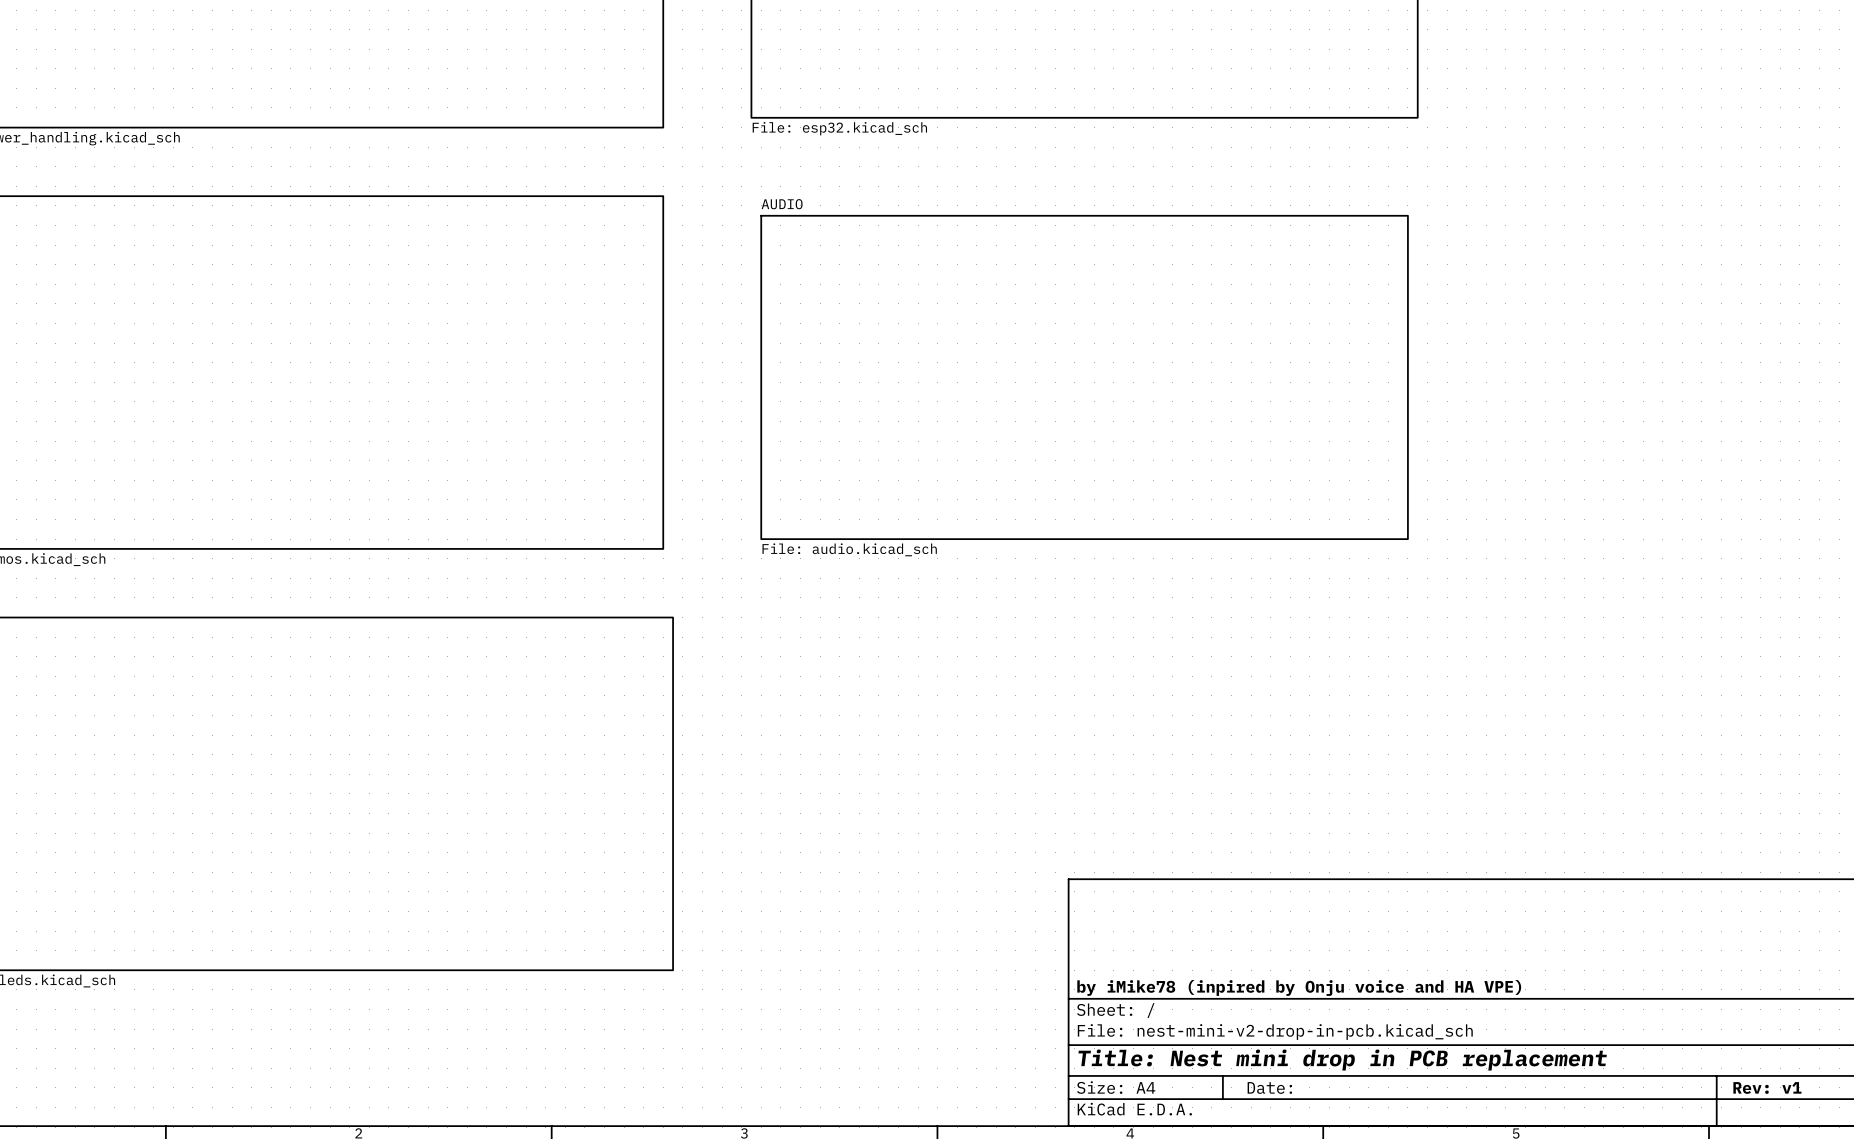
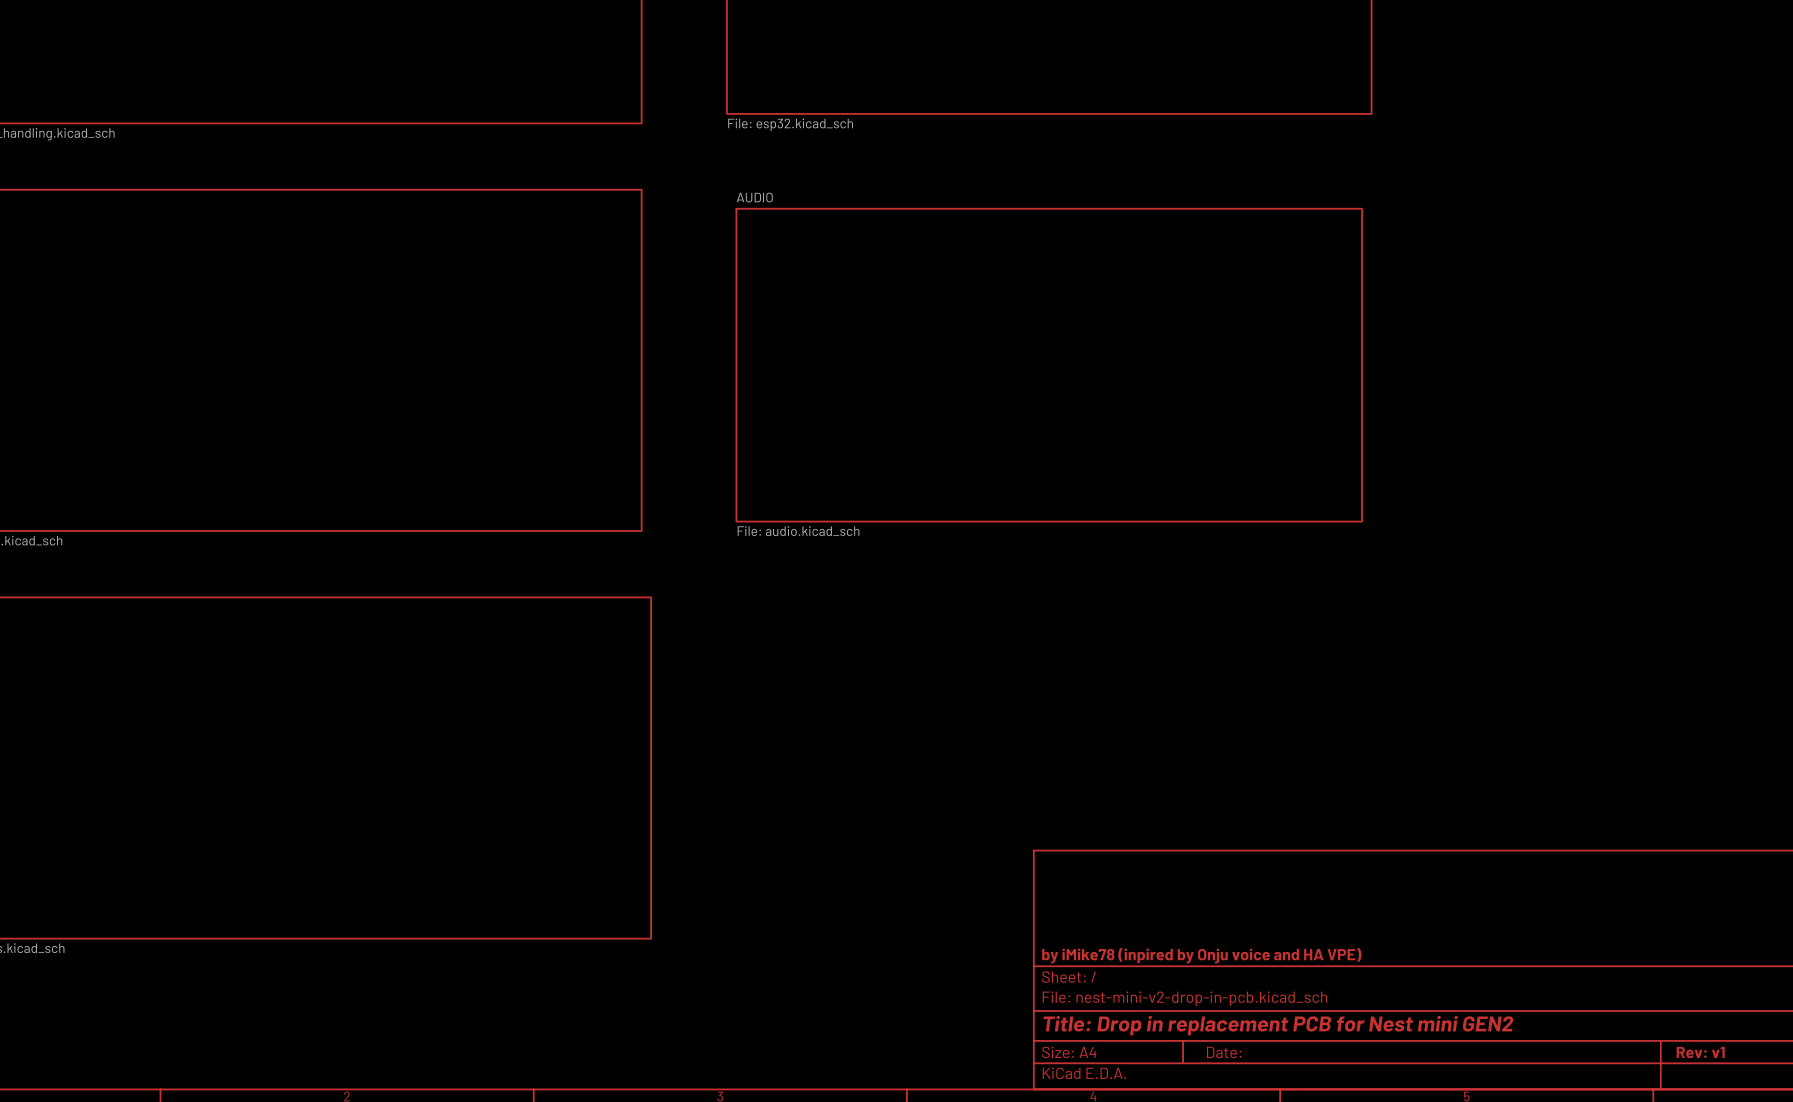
title block: Title: Nest mini drop in PCB replacement (1342, 1060) -> Title: Drop in replacement PCB for Nest mini GEN2 (1278, 1025)

